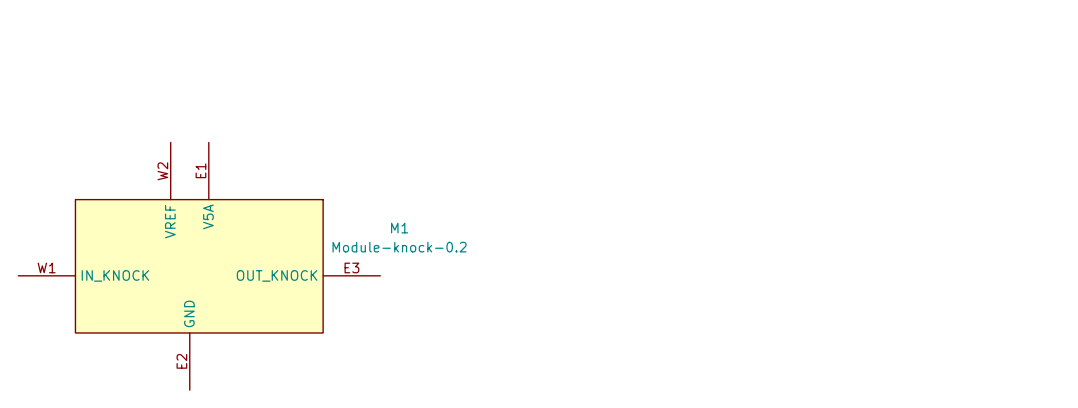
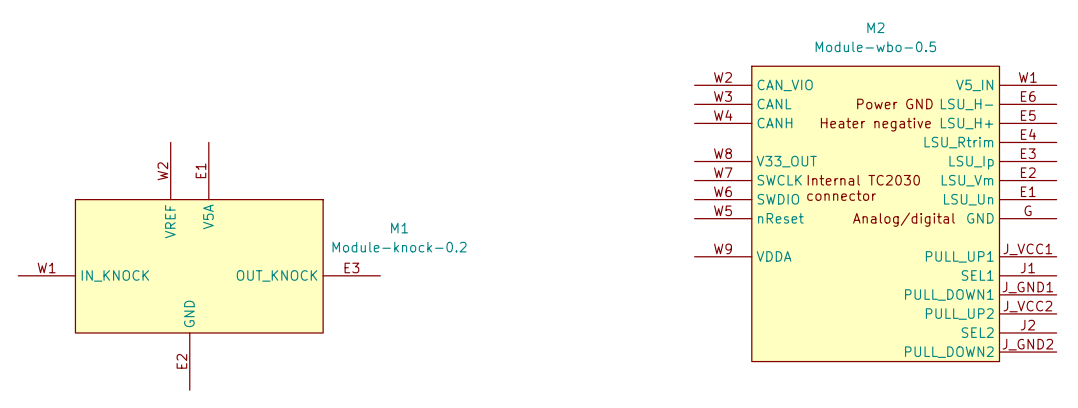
M2: none -> Module-wbo-0.5 (875, 213)

